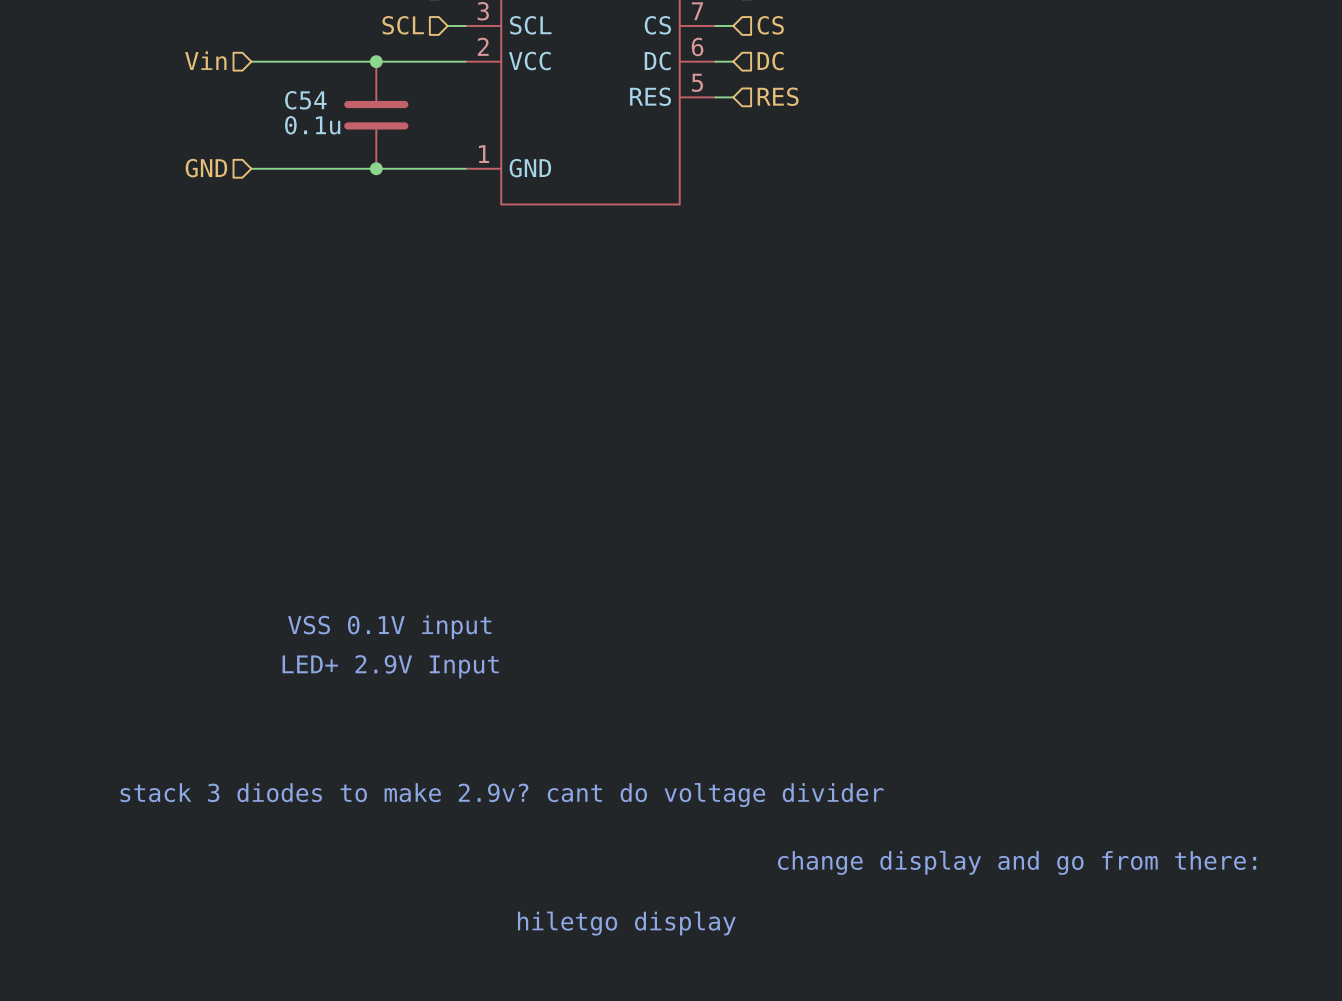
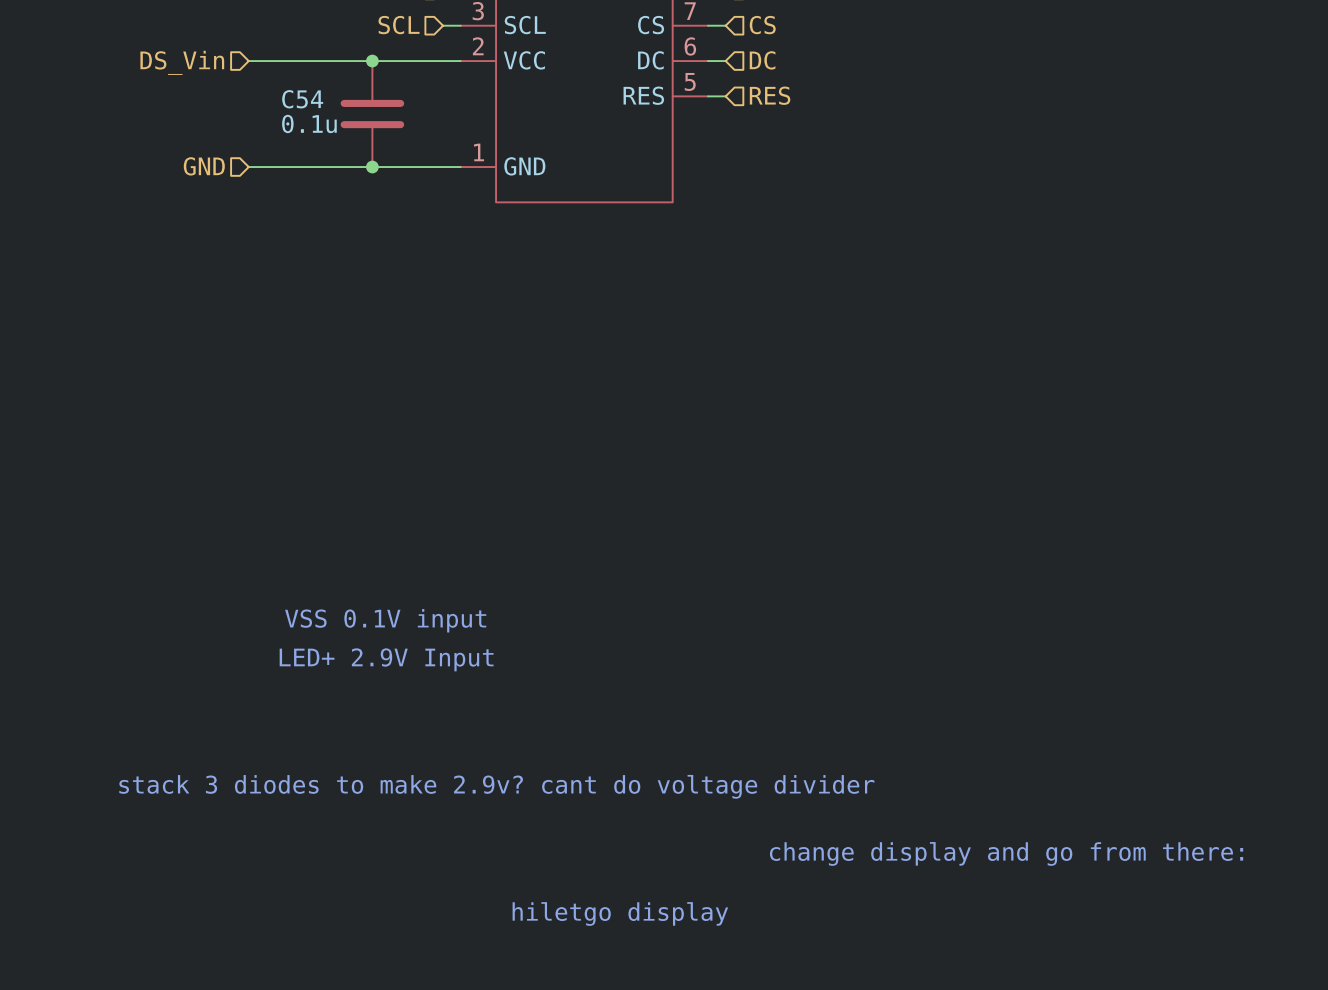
hierarchical label: Vin (205, 60) -> DS_Vin (182, 62)

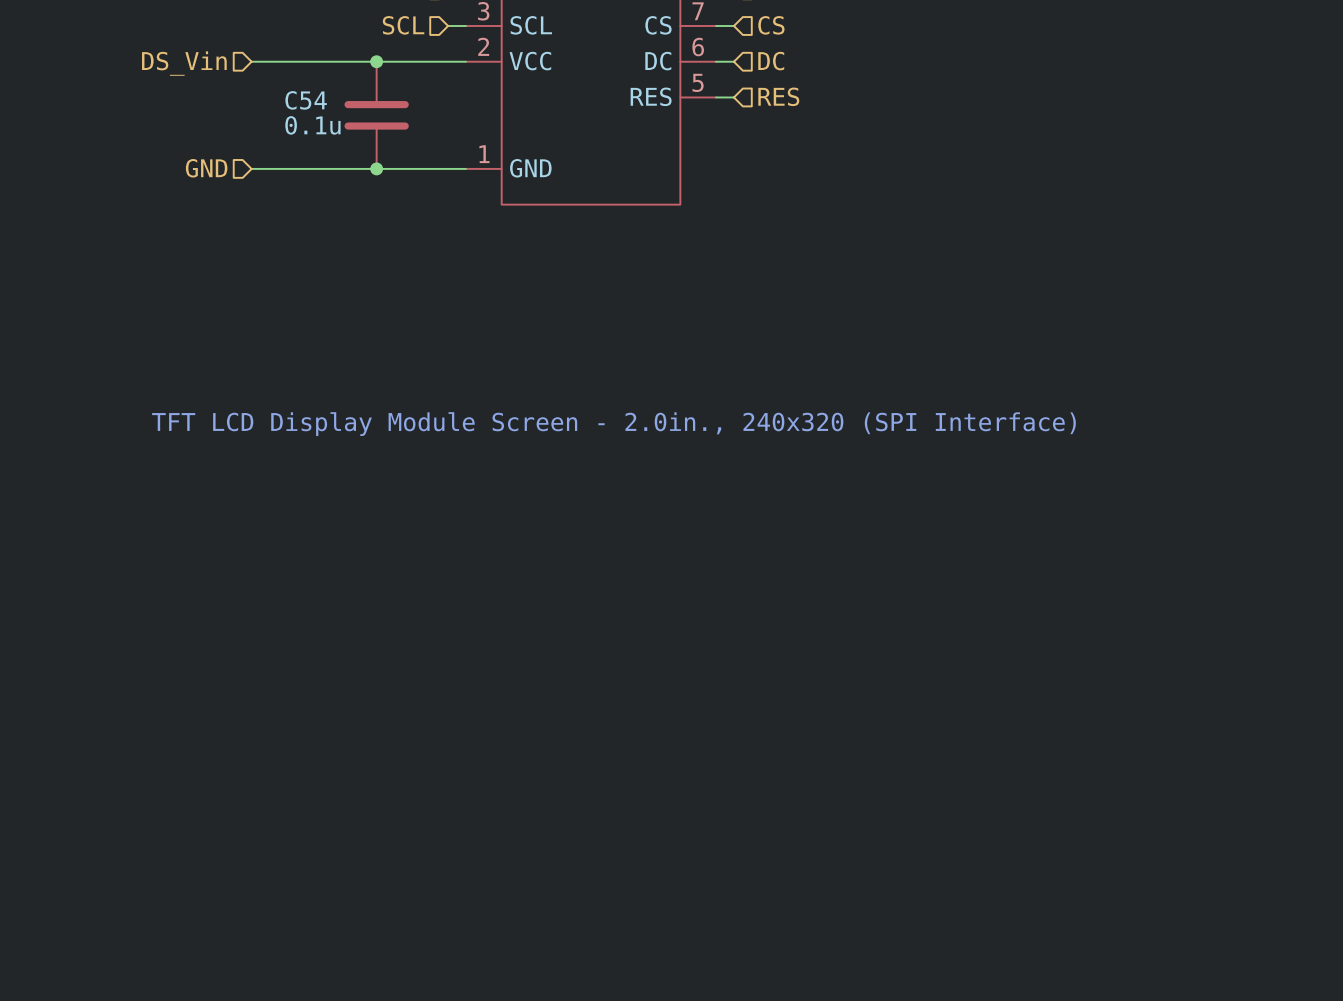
text: none -> TFT LCD Display Module Screen - 2.0in., 240x320 (SPI Interface) (613, 424)
text: VSS 0.1V input (385, 620) -> none
text: LED+ 2.9V Input (386, 659) -> none
text: stack 3 diodes to make 2.9v? cant do voltage divider (496, 786) -> none
text: change display and go from there: (1006, 853) -> none
text: hiletgo display (620, 914) -> none

